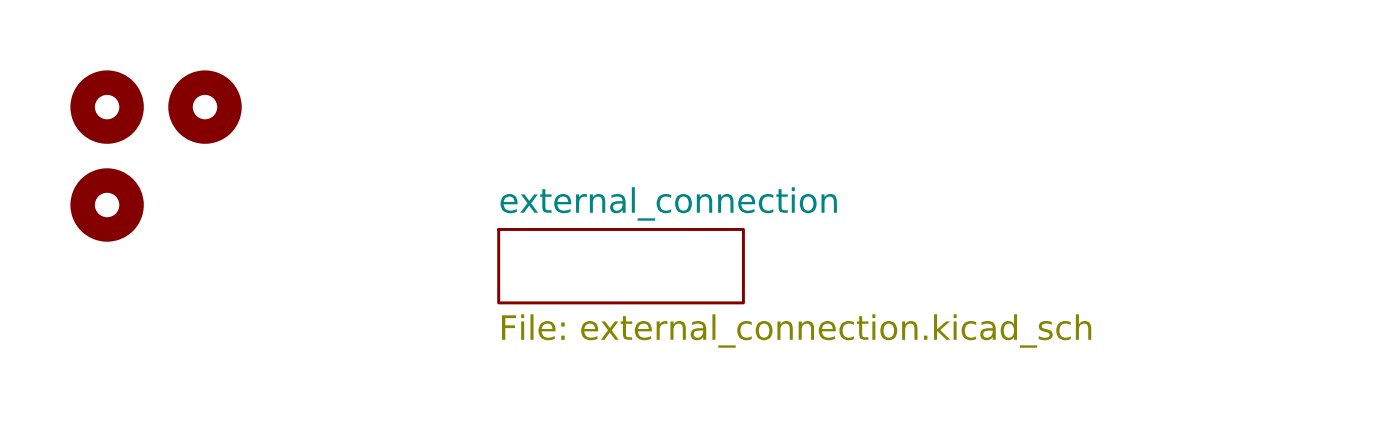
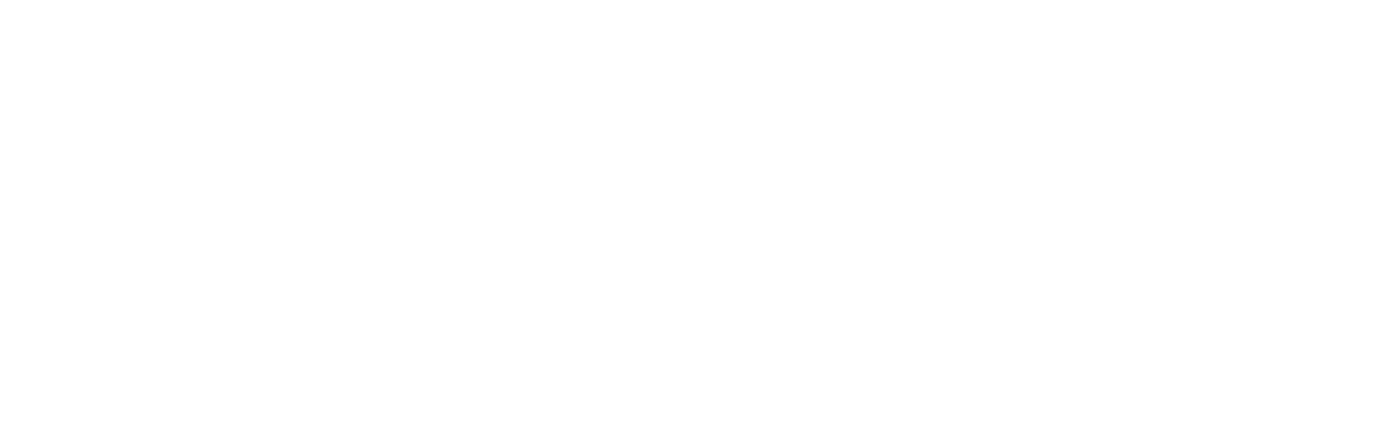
part: (107, 107) -> none
part: (205, 107) -> none
part: (107, 205) -> none
sheet external_connection: File: external_connection.kicad_sch (621, 266) -> none

